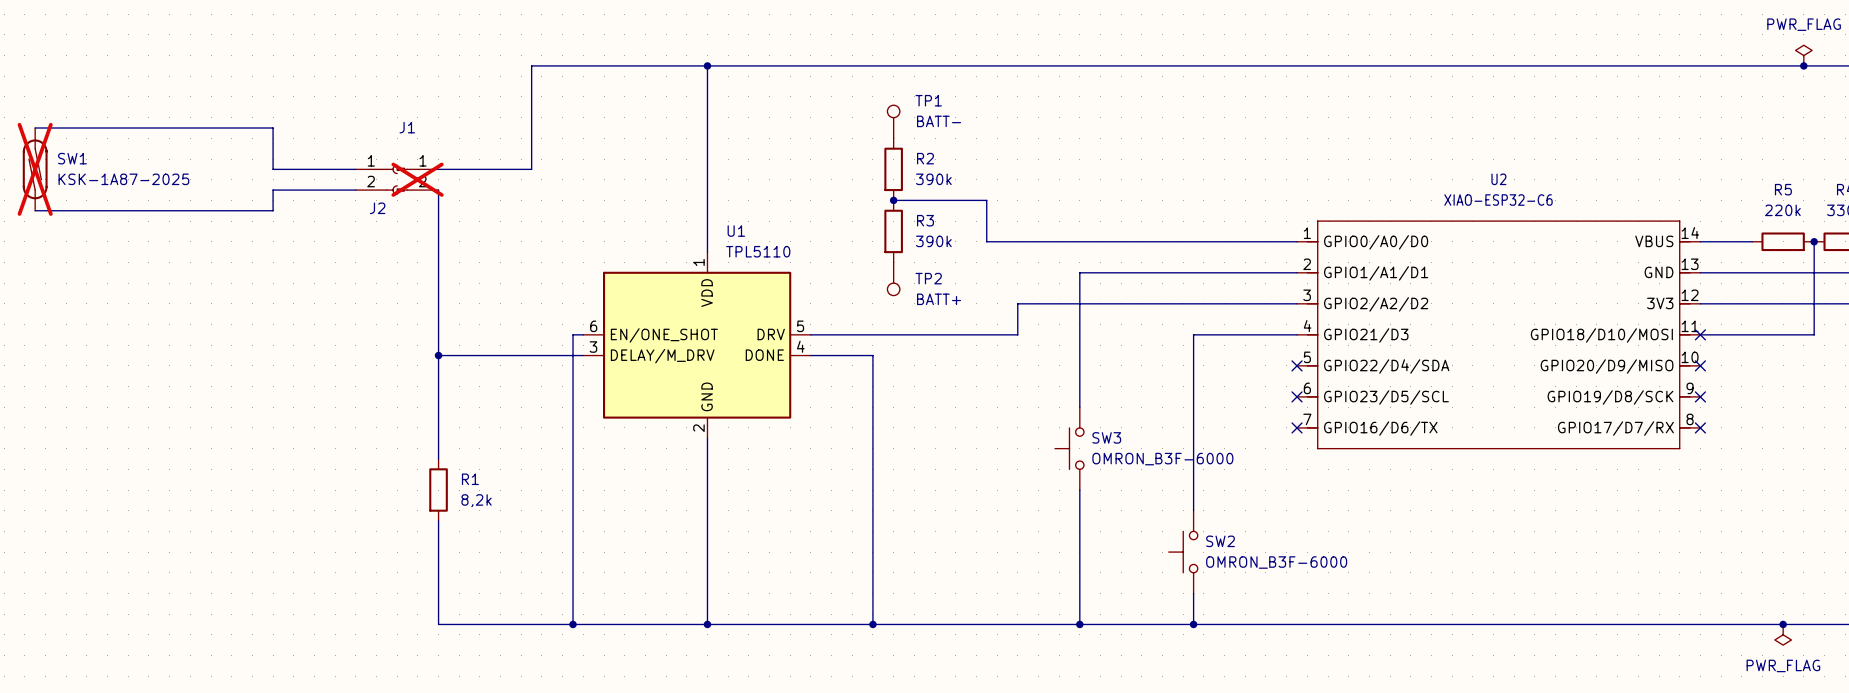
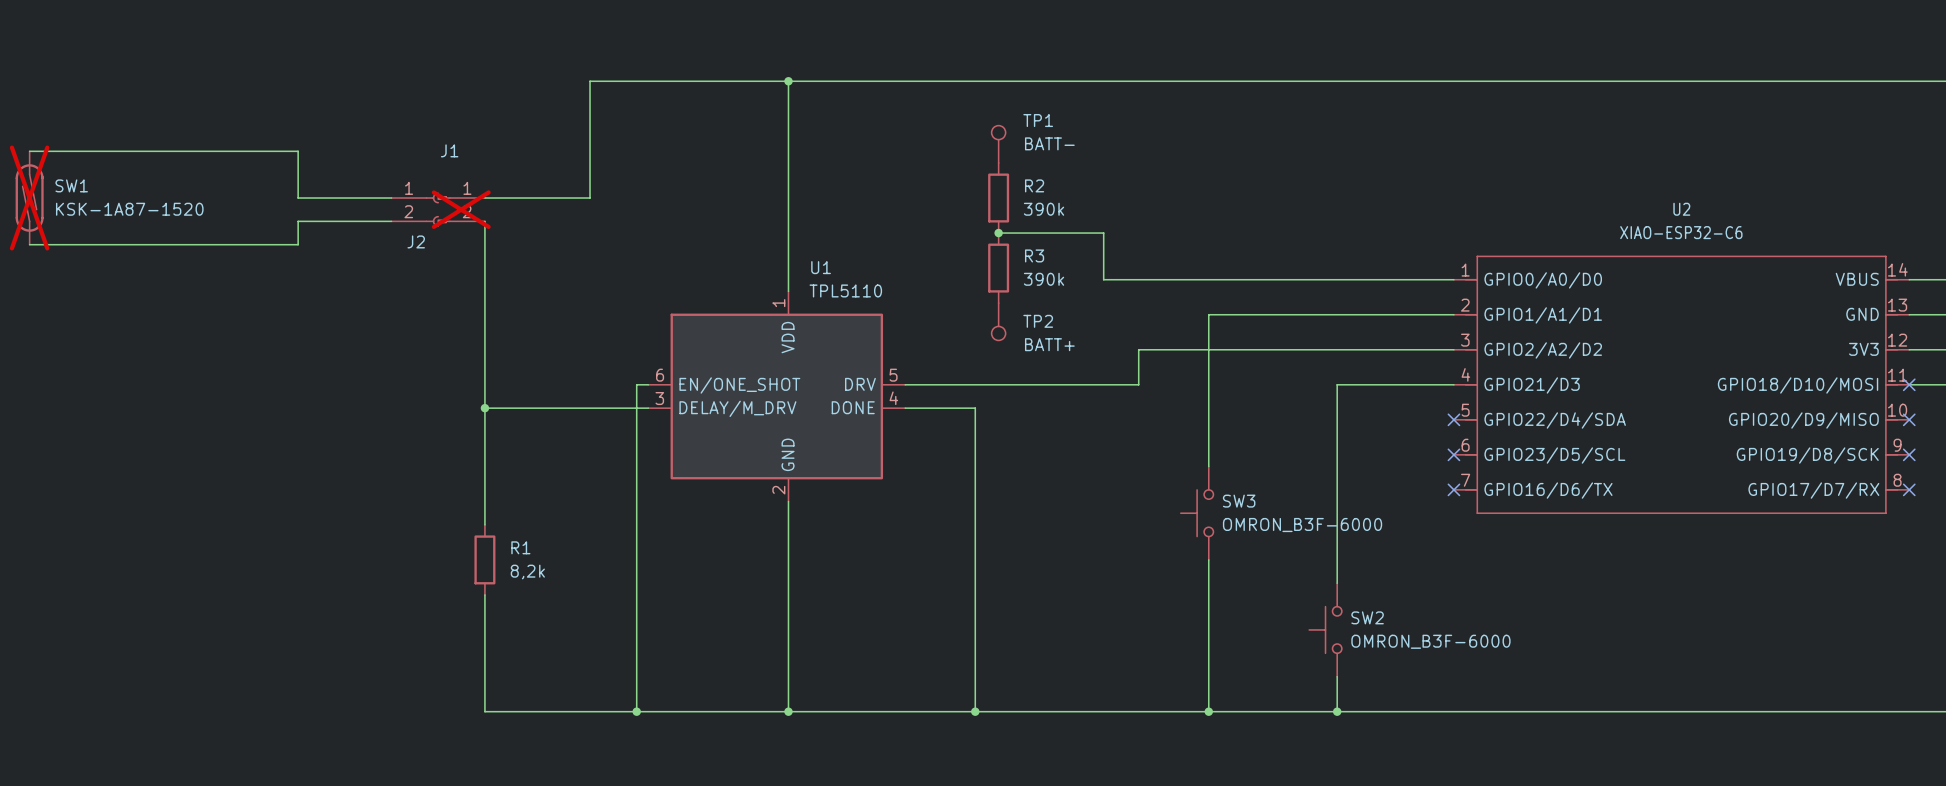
SW1 value: KSK-1A87-2025 (123, 179) -> KSK-1A87-1520 (129, 209)

